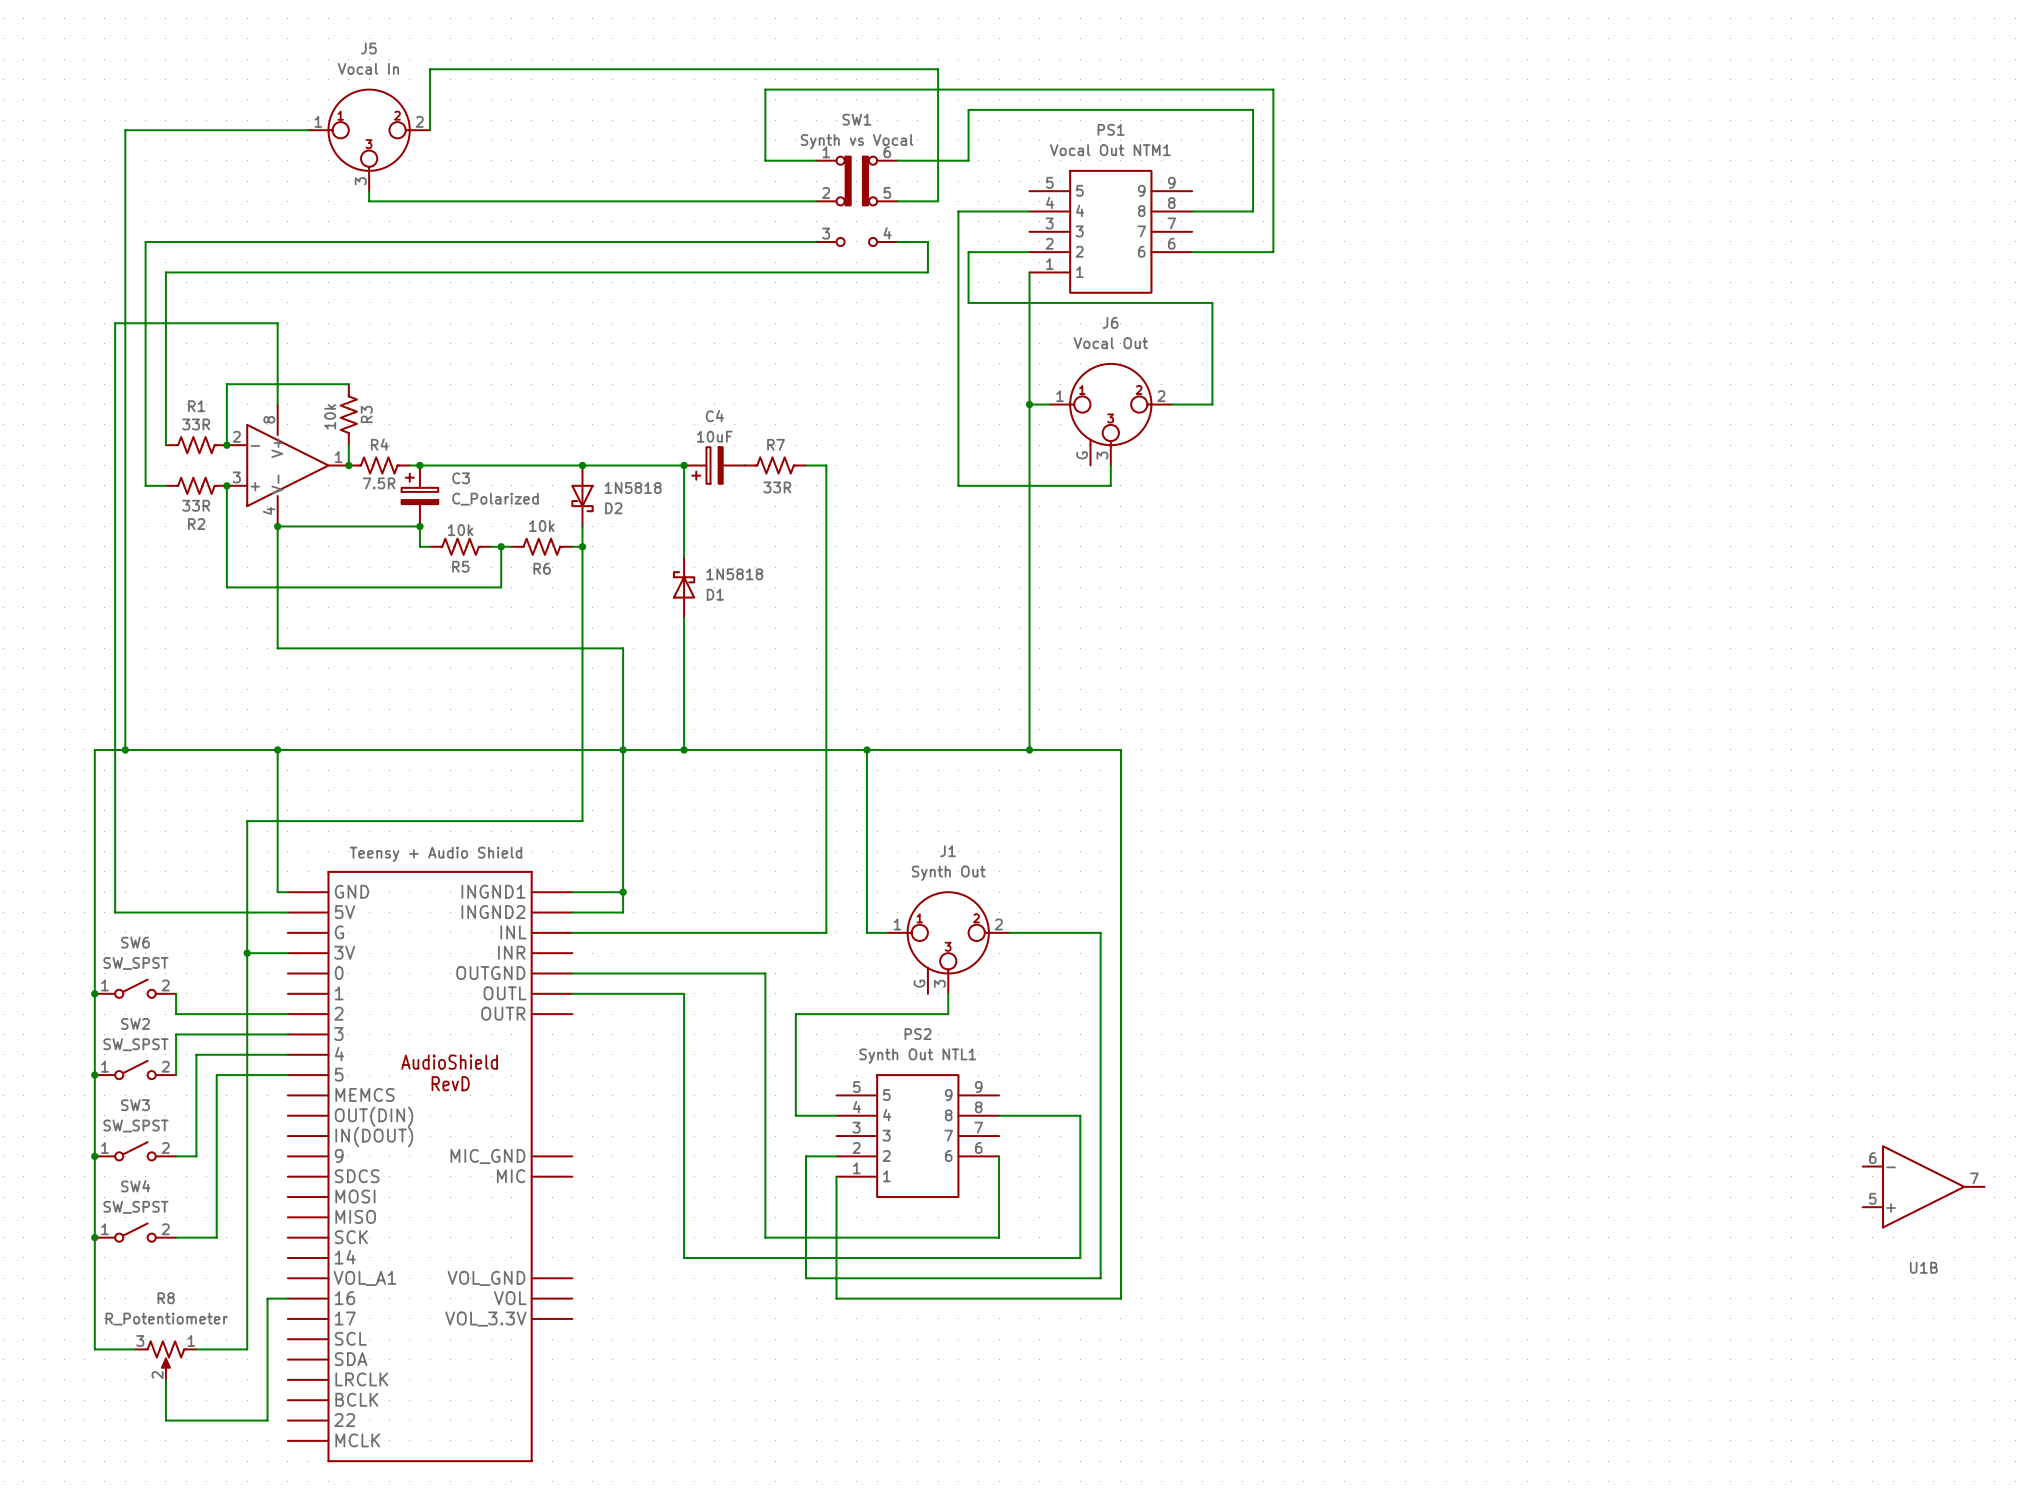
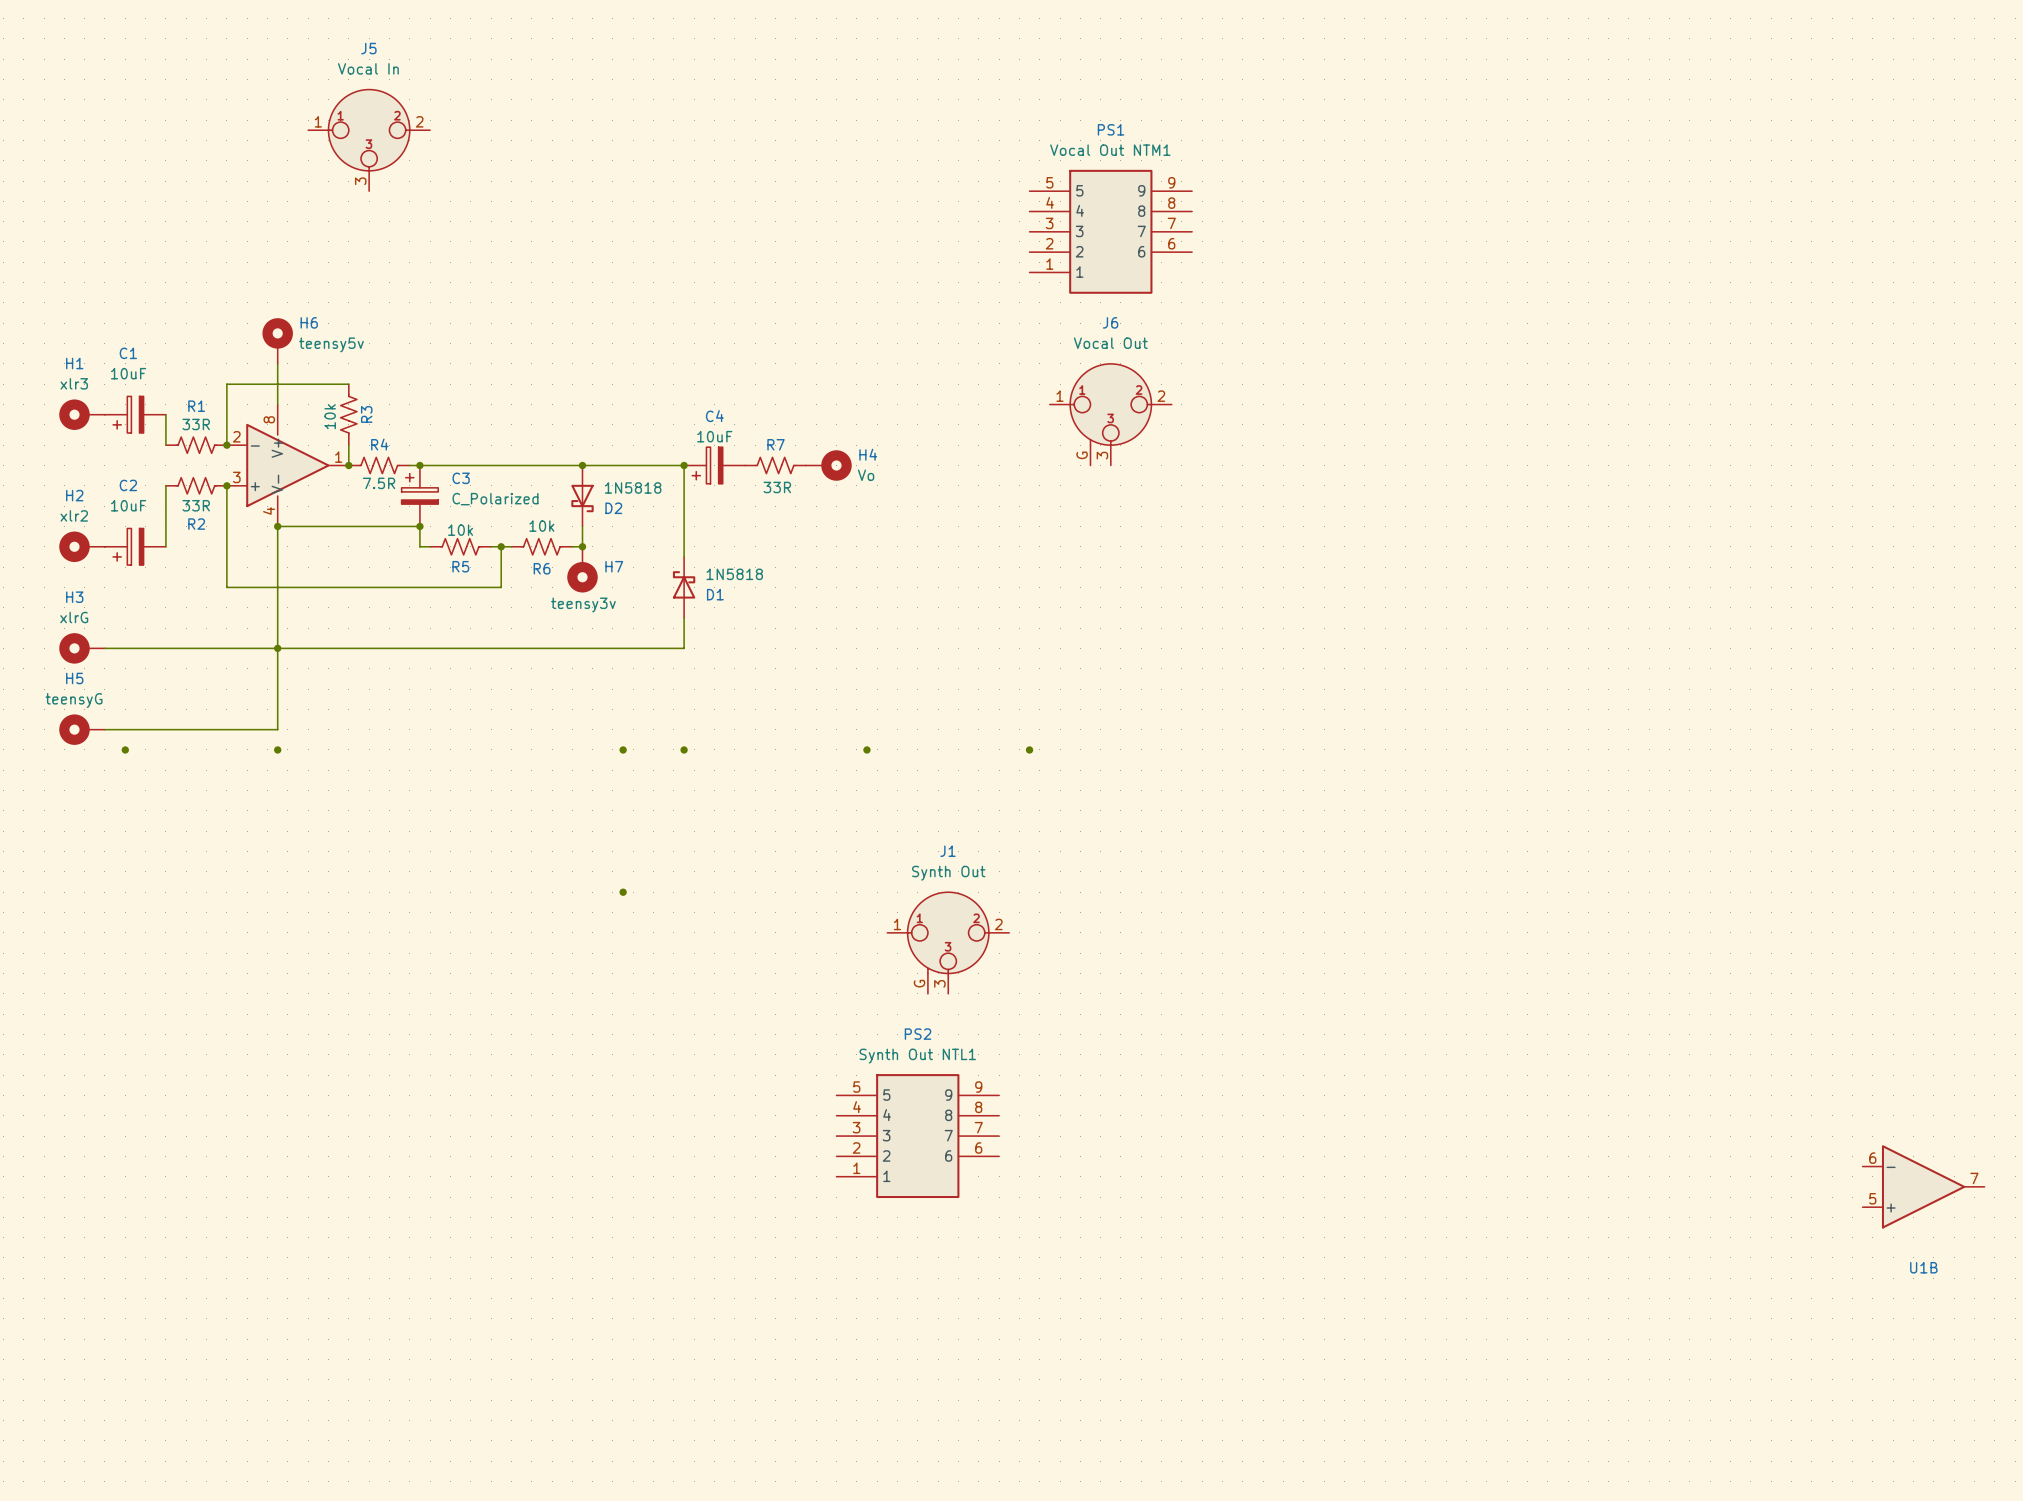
wire: (308, 130) (125, 130) (125, 749) -> none
wire: (430, 130) (430, 69) (938, 69) (938, 201) (897, 201) -> none
wire: (816, 160) (765, 160) (765, 89) (1273, 89) (1273, 252) (1192, 252) -> none
wire: (897, 160) (968, 160) (968, 109) (1253, 109) (1253, 211) (1192, 211) -> none
wire: (369, 191) (369, 201) (816, 201) -> none
SW1: Synth vs Vocal (856, 201) -> none
wire: (1029, 211) (958, 211) (958, 485) (1110, 485) (1110, 465) -> none
wire: (816, 241) (145, 241) (145, 485) (165, 485) -> (165, 546) (165, 485)
wire: (897, 241) (927, 241) (927, 272) (165, 272) (165, 414) -> none
wire: (1029, 252) (968, 252) (968, 302) (1212, 302) (1212, 404) (1171, 404) -> none
wire: (1029, 272) (1029, 749) -> none
H6: none -> teensy5v (277, 341)
wire: (277, 363) (277, 323) (115, 323) (115, 912) (287, 912) -> none
wire: (1029, 404) (1049, 404) -> none
junction: (1029, 404) -> none
H1: none -> xlr3 (82, 414)
C1: none -> 10uF (135, 414)
wire: (806, 465) (826, 465) (826, 932) (572, 932) -> none
H4: none -> Vo (828, 465)
H2: none -> xlr2 (82, 546)
C2: none -> 10uF (135, 546)
wire: (582, 546) (582, 821) (247, 821) (247, 1349) (196, 1349) -> none
H7: none -> teensy3v (582, 569)
H3: none -> xlrG (82, 648)
wire: none -> (104, 648) (277, 648) (277, 729) (104, 729)
junction: none -> (277, 648)
wire: (623, 648) (623, 912) (572, 912) -> none
wire: (684, 648) (684, 749) -> (684, 648) (623, 648)
H5: none -> teensyG (82, 729)
wire: (277, 749) (277, 892) (287, 892) -> none
wire: (866, 749) (866, 932) (887, 932) -> none
label: Teensy + Audio Shield (435, 854) -> none
wire: (572, 892) (623, 892) -> none
wire: (1009, 932) (1100, 932) (1100, 1278) (806, 1278) (806, 1156) (836, 1156) -> none
wire: (247, 953) (287, 953) -> none
junction: (247, 953) -> none
wire: (572, 973) (765, 973) (765, 1237) (999, 1237) (999, 1156) -> none
SW6: SW_SPST (135, 988) -> none
junction: (94, 993) -> none
wire: (176, 993) (176, 1014) (287, 1014) -> none
wire: (572, 993) (684, 993) (684, 1257) (1080, 1257) (1080, 1115) (999, 1115) -> none
wire: (948, 993) (948, 1014) (795, 1014) (795, 1115) (836, 1115) -> none
wire: (287, 1034) (176, 1034) (176, 1075) -> none
wire: (287, 1054) (196, 1054) (196, 1156) (176, 1156) -> none
SW2: SW_SPST (135, 1070) -> none
junction: (94, 1075) -> none
wire: (287, 1075) (216, 1075) (216, 1237) (176, 1237) -> none
SW3: SW_SPST (135, 1151) -> none
junction: (94, 1156) -> none
part: (430, 1166) -> none
wire: (836, 1176) (836, 1298) (1120, 1298) (1120, 749) (94, 749) (94, 1349) (135, 1349) -> none
SW4: SW_SPST (135, 1232) -> none
junction: (94, 1237) -> none
wire: (287, 1298) (267, 1298) (267, 1420) (165, 1420) (165, 1379) -> none
R8: R_Potentiometer (165, 1360) -> none

